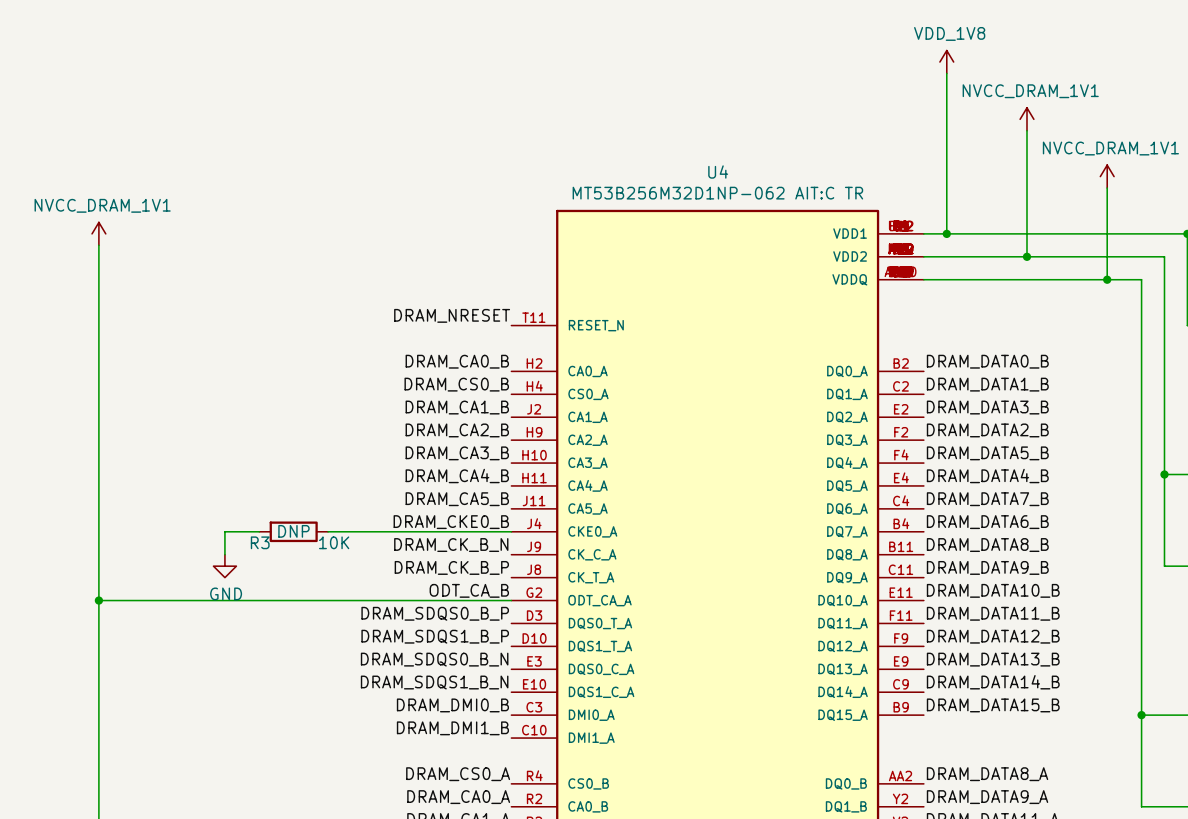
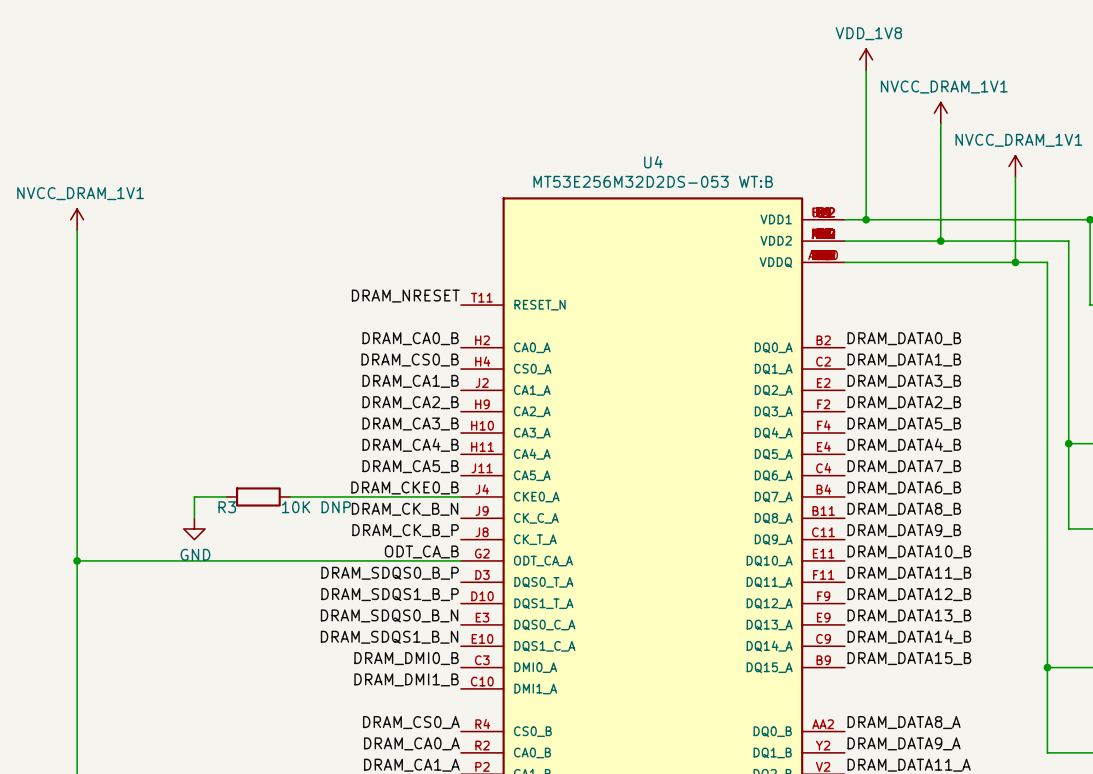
U4 value: MT53B256M32D1NP-062 AIT:C TR (717, 193) -> MT53E256M32D2DS-053 WT:B (653, 181)
R3 text: DNP (293, 531) -> none
R3 value: 10K (334, 542) -> 10K DNP (316, 507)

